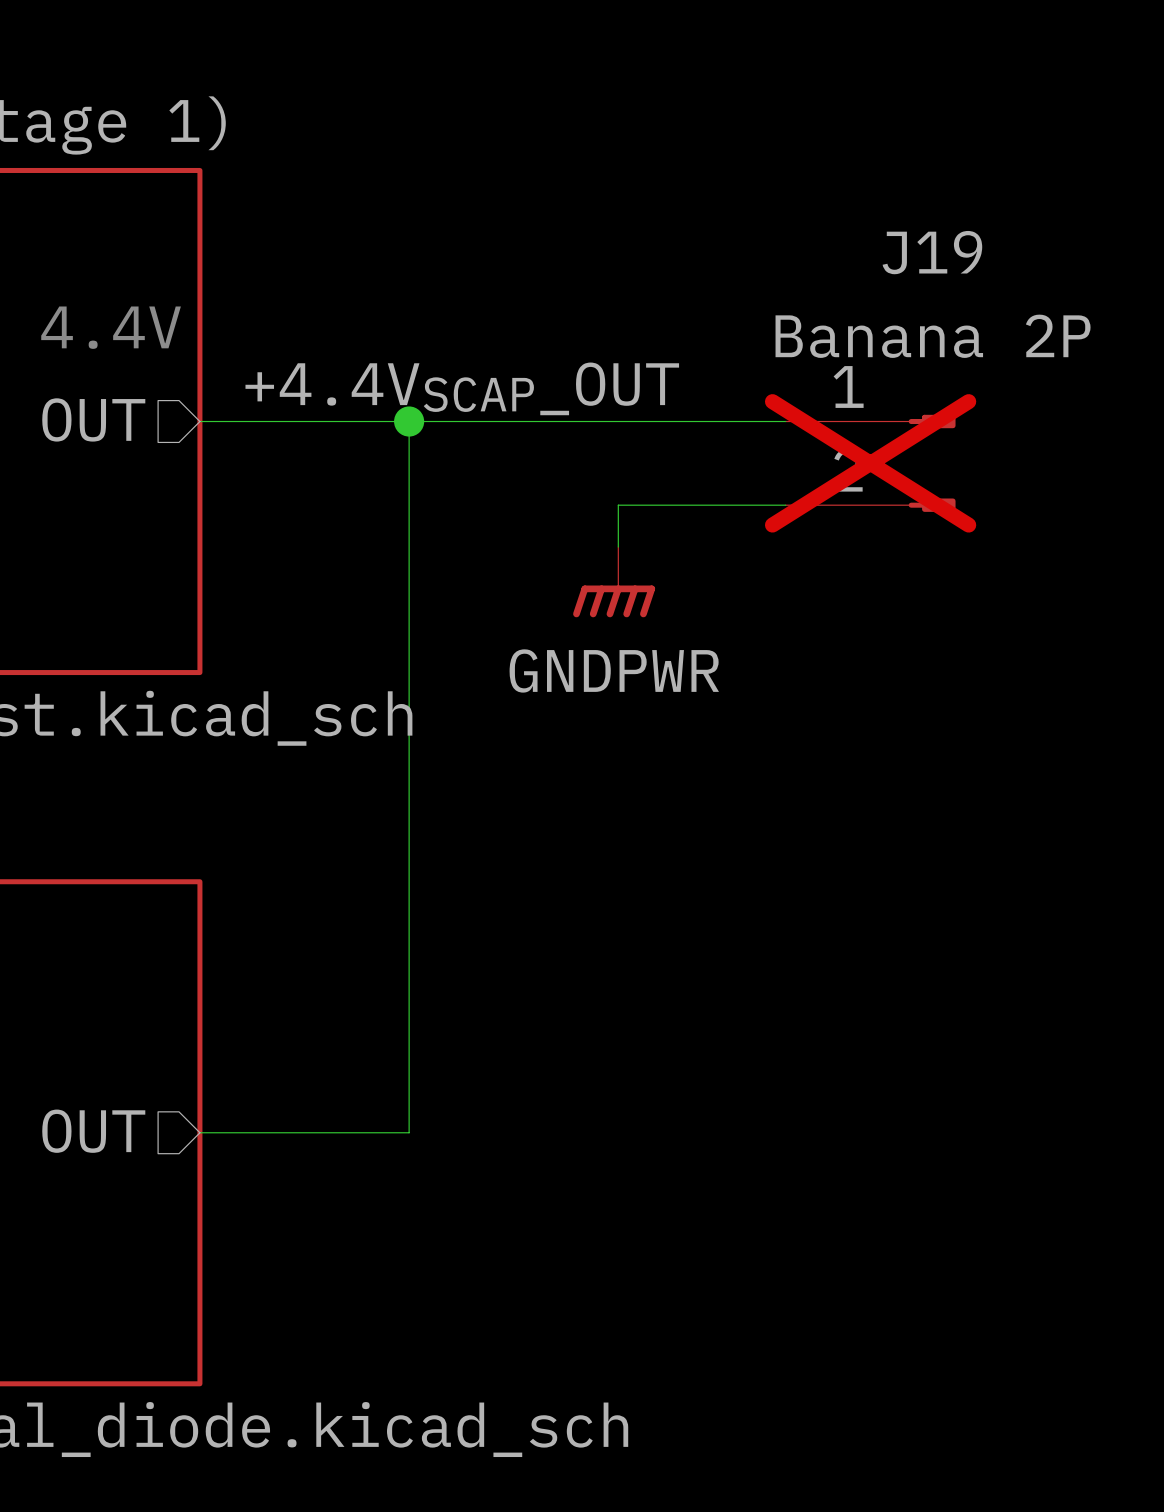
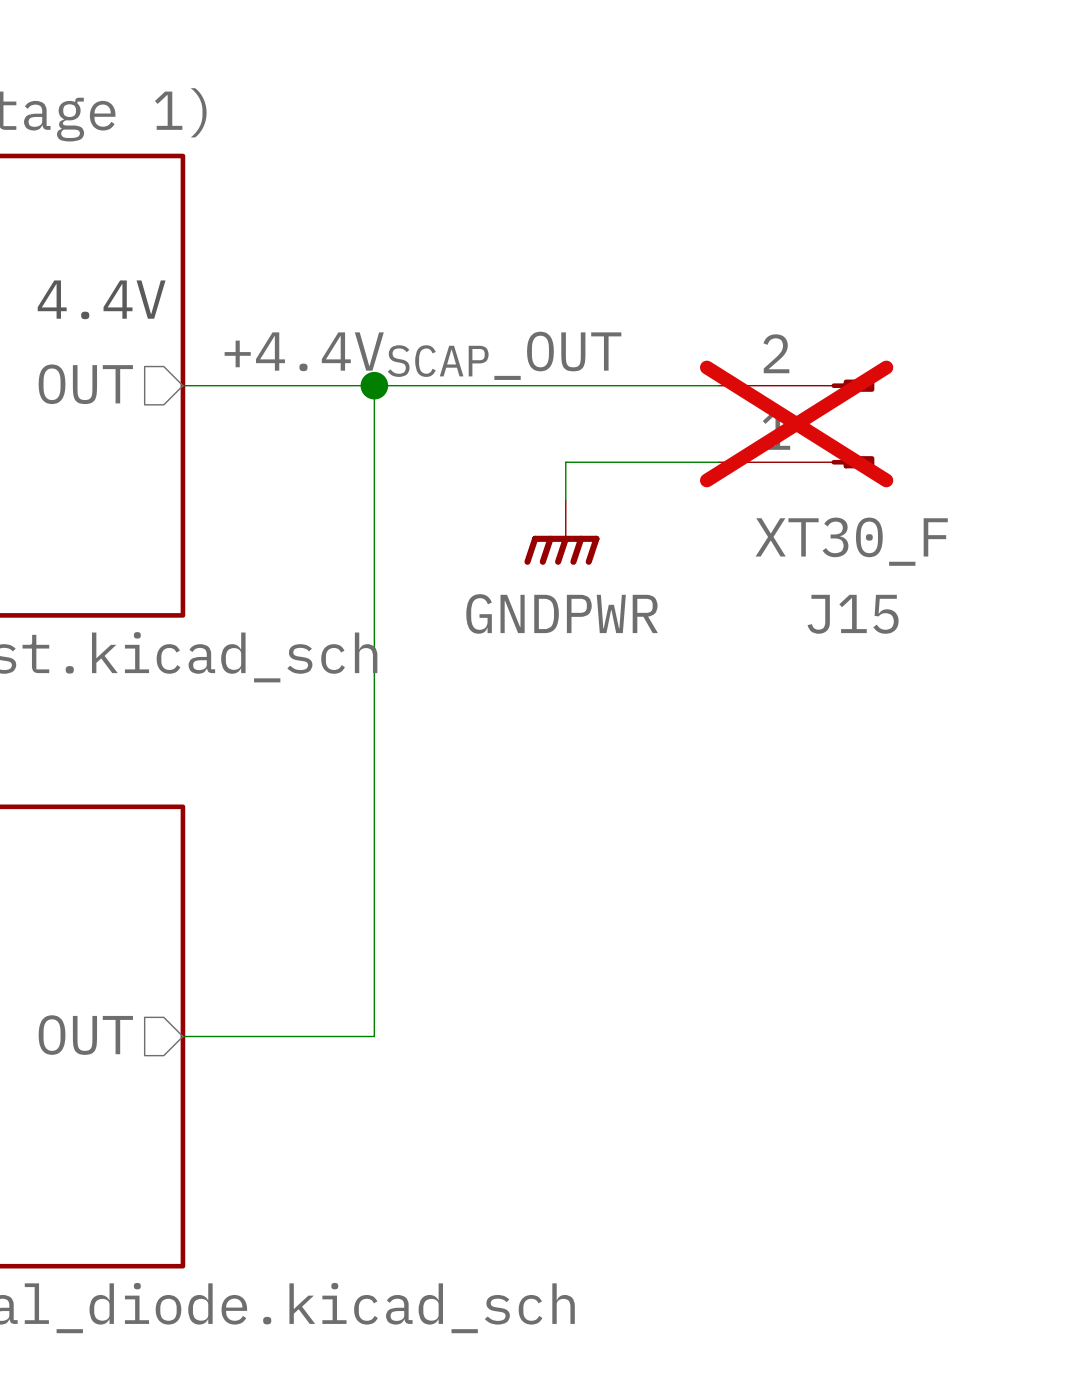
J19 name: J19 (932, 252) -> J15 (853, 614)
J19 value: Banana 2P (933, 336) -> XT30_F (851, 541)
J19 flip: as is (932, 463) -> up-down (852, 423)

